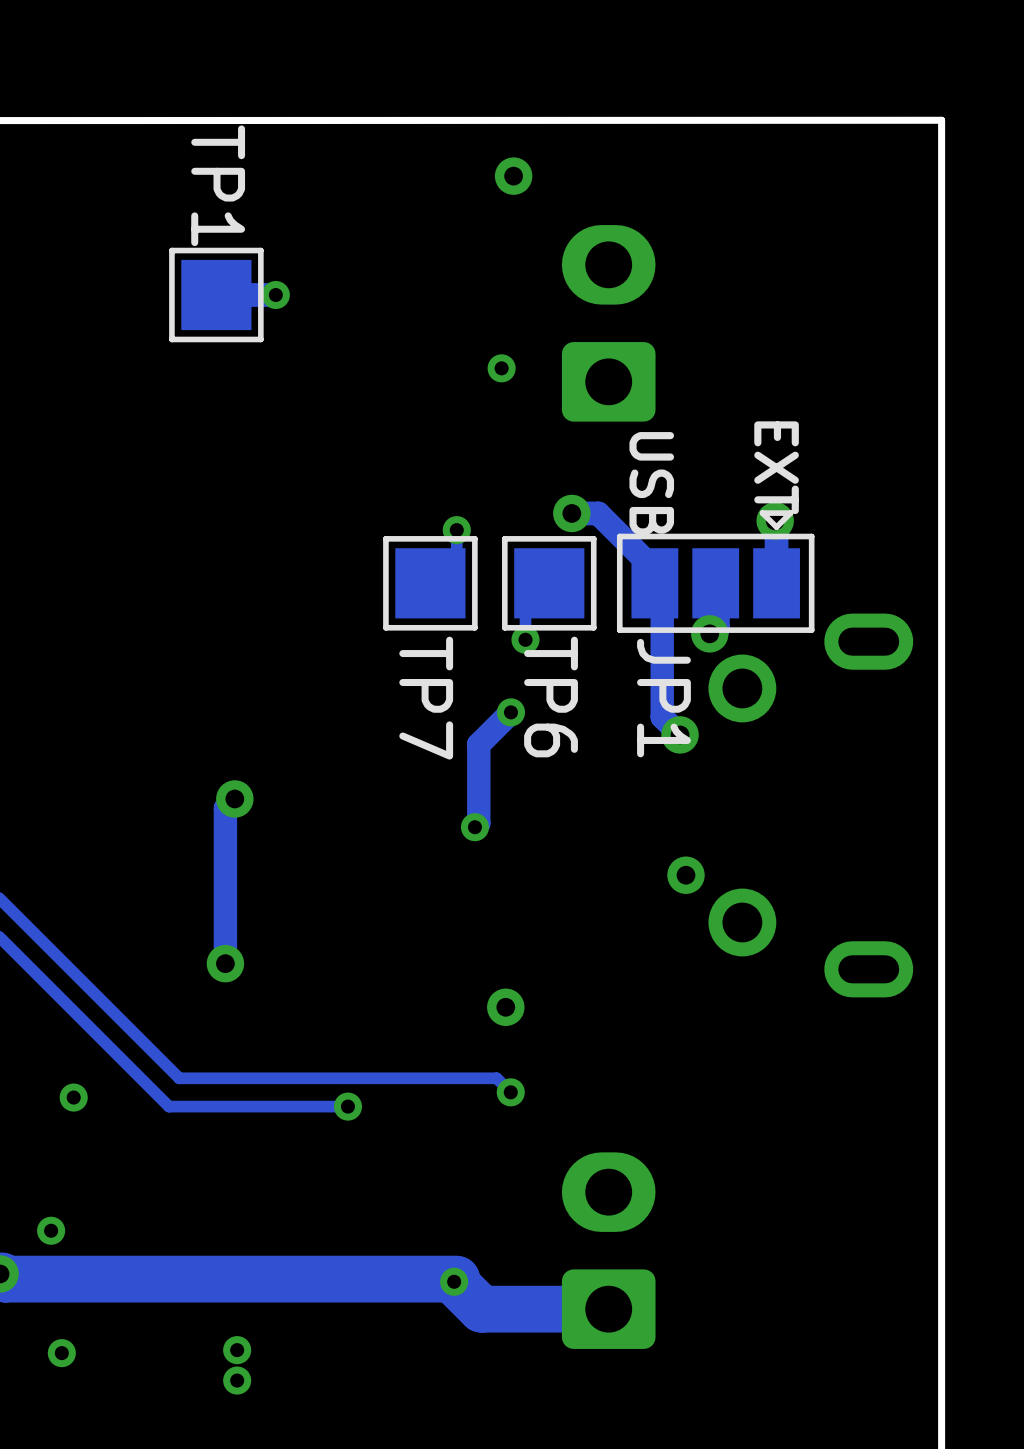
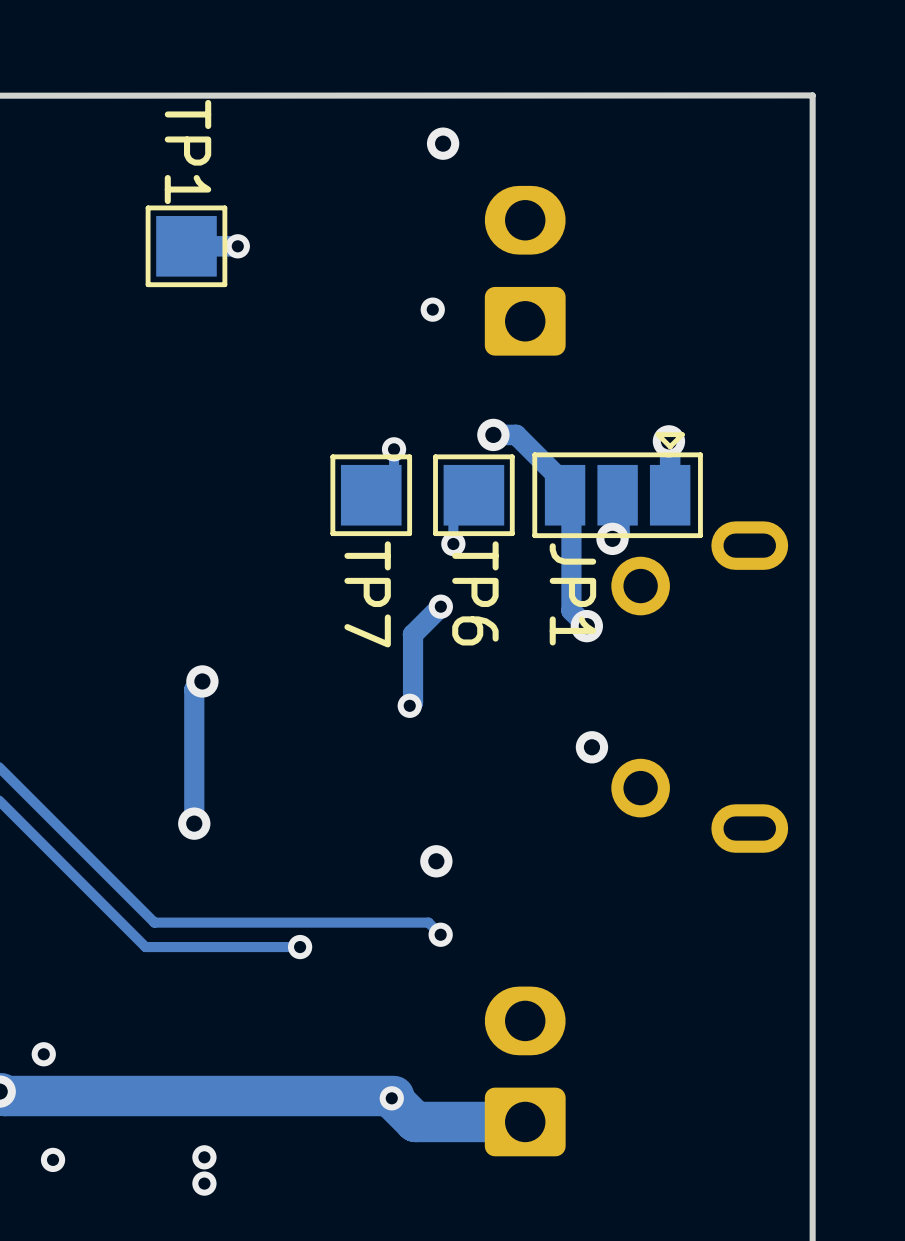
text: EXT (776, 467) -> none
text: USB (651, 483) -> none
via: (73, 1097) -> none

